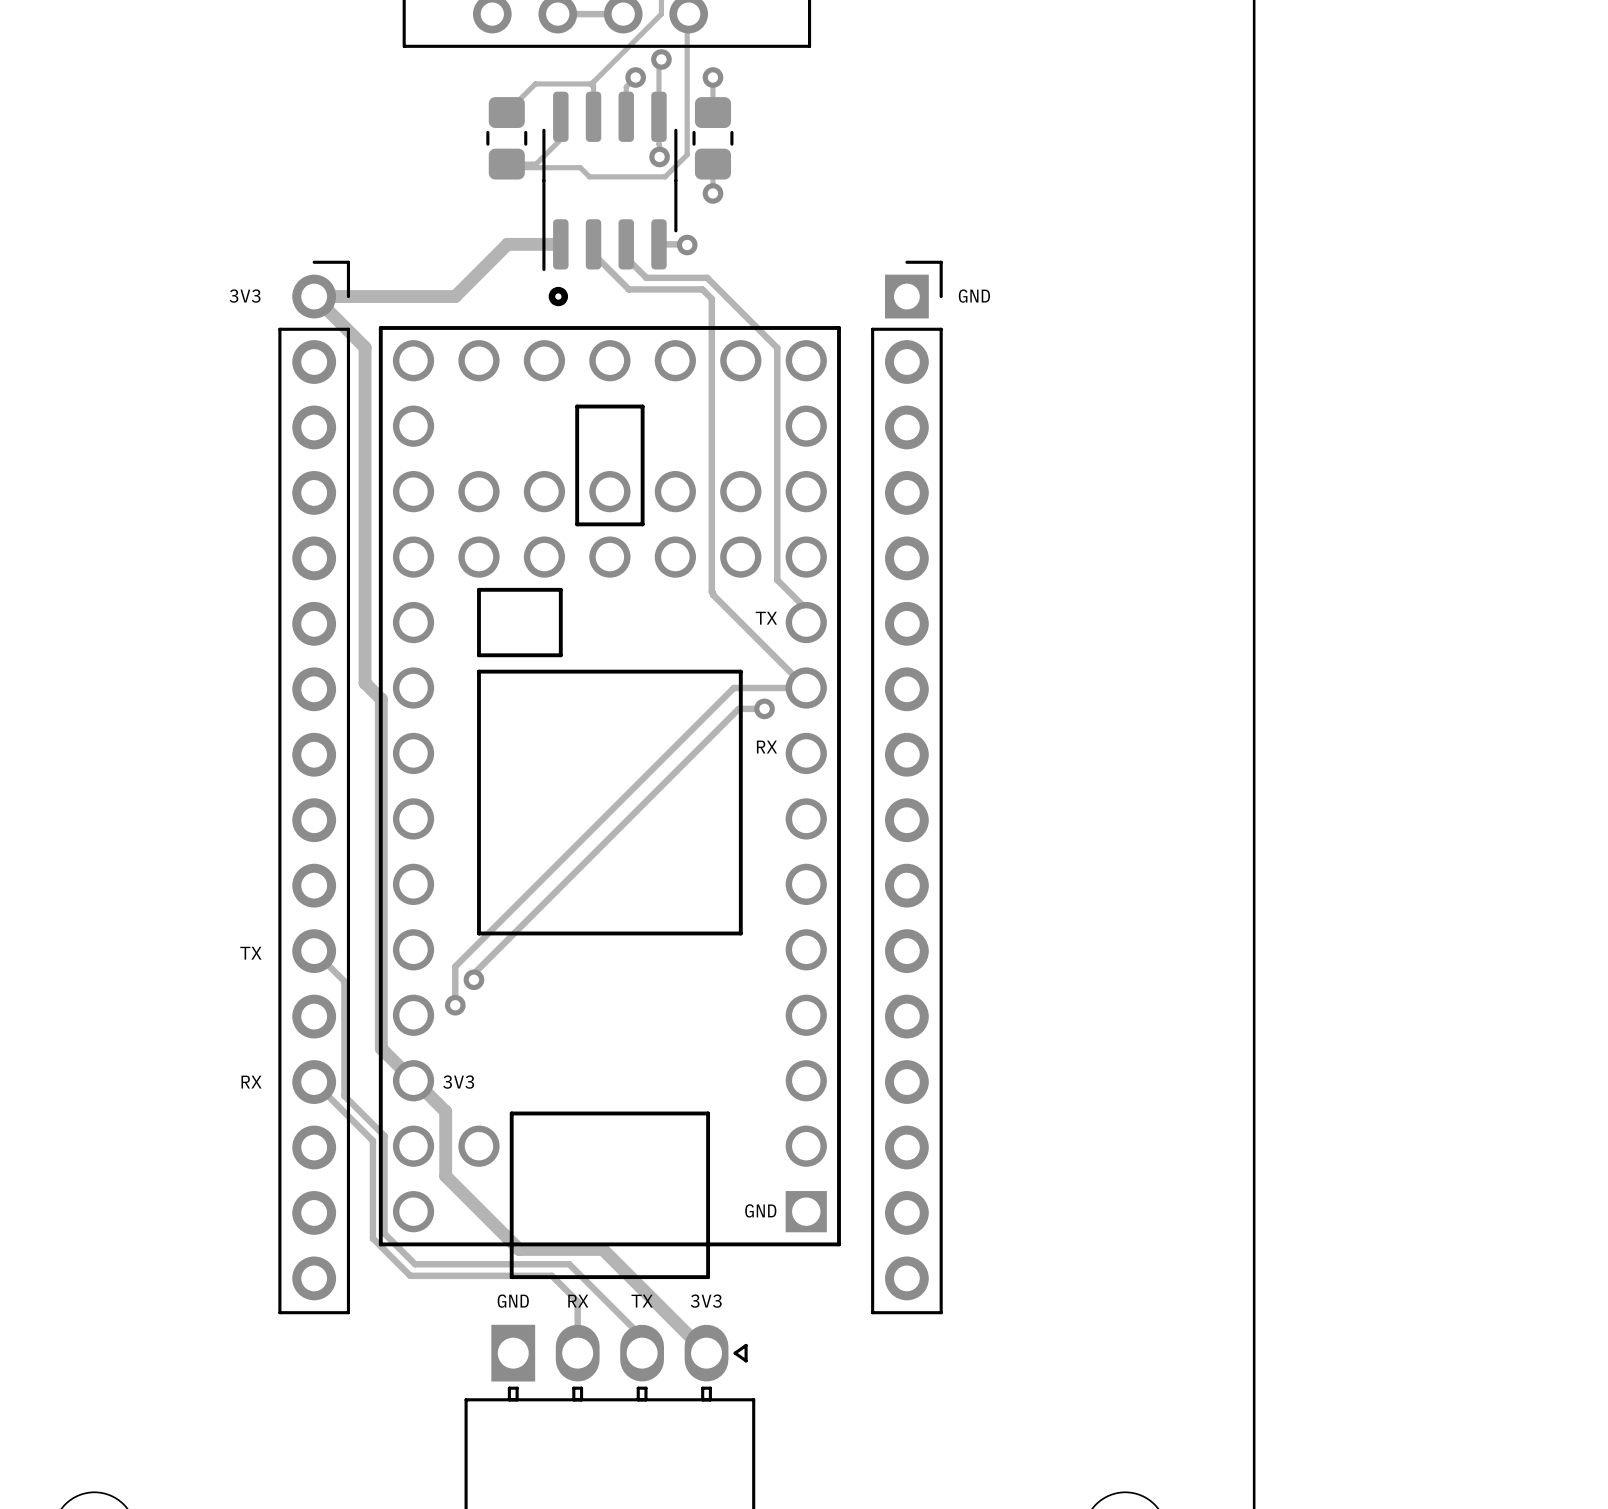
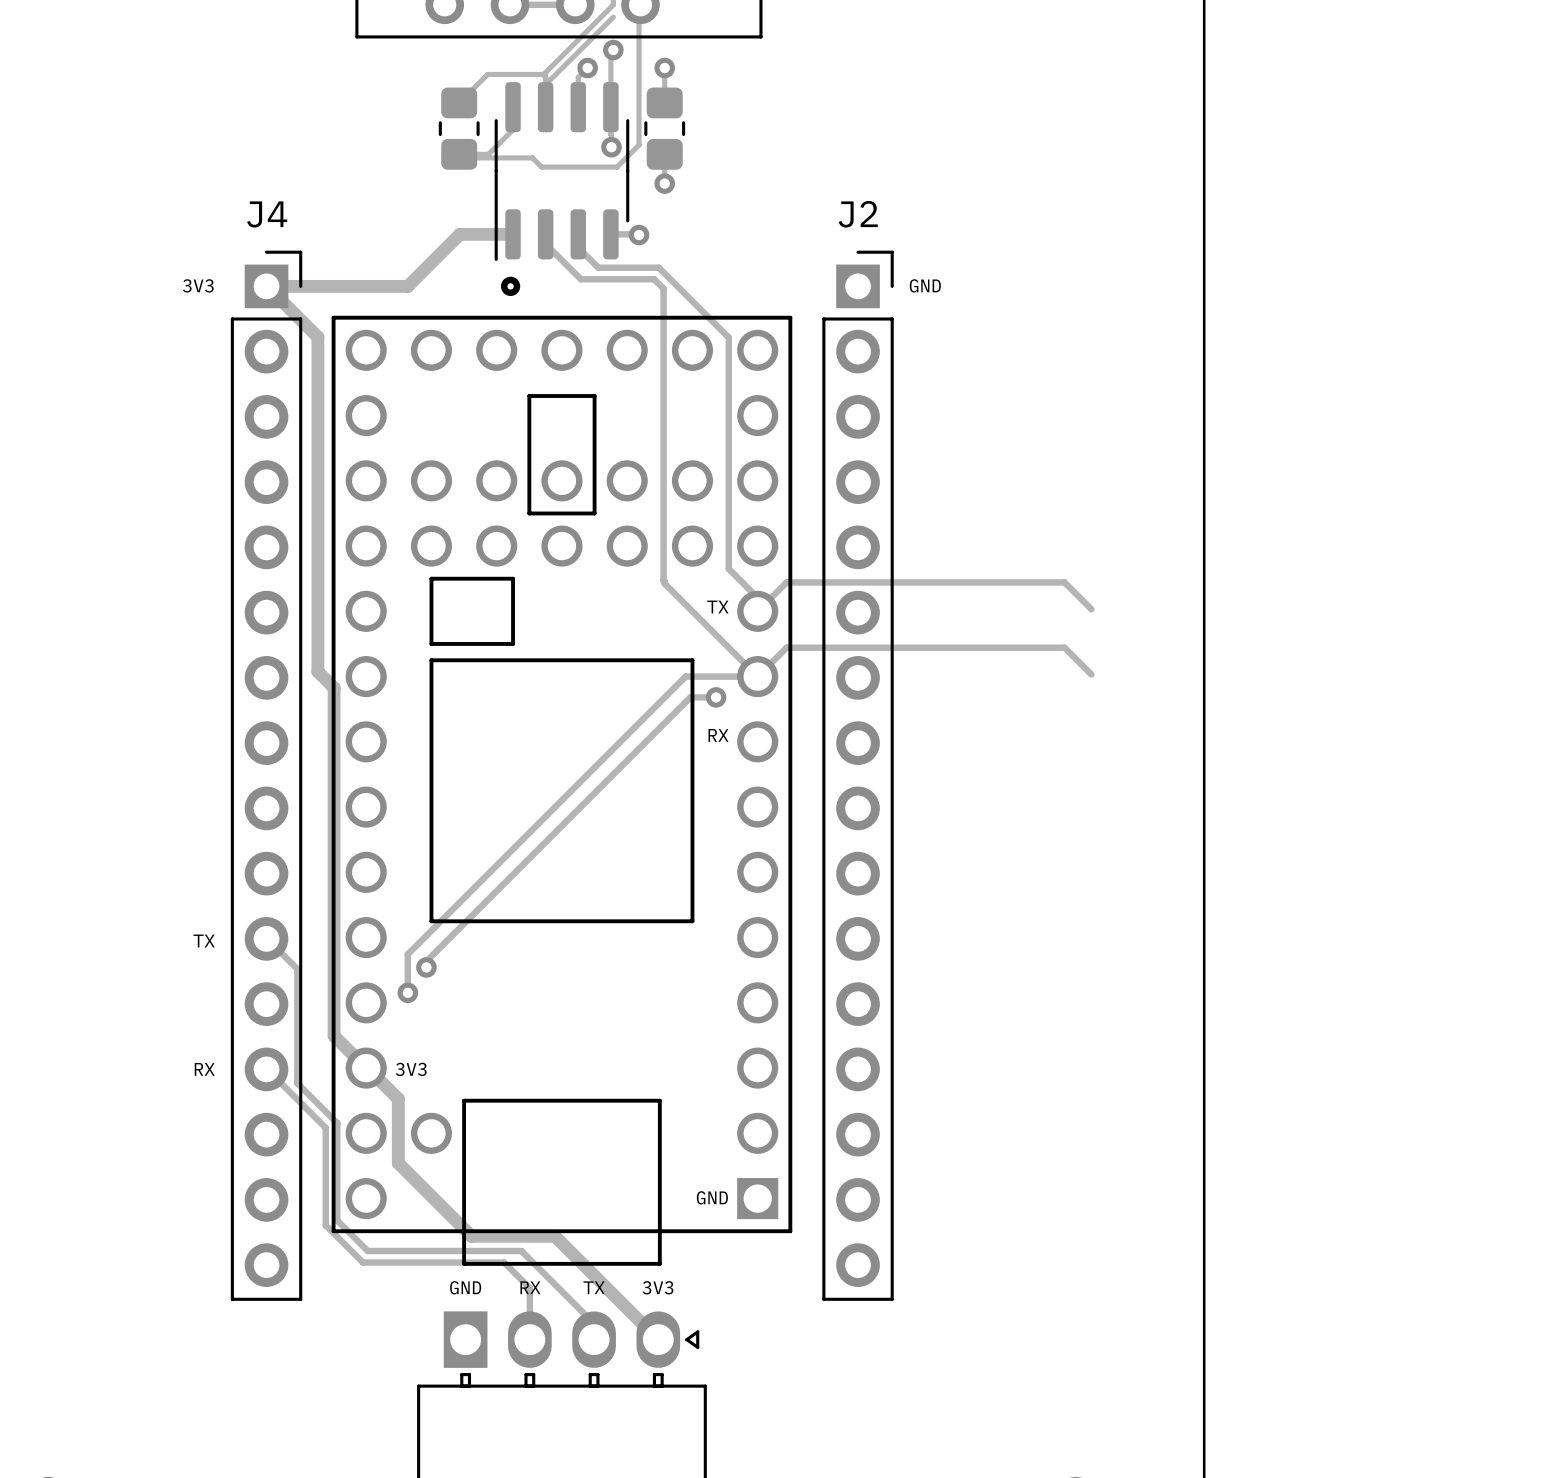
track: none -> (613, 17) (545, 84)
J2 name: none -> J2 (858, 214)
track: none -> (1091, 609) (1064, 582) (786, 582) (757, 611)
track: none -> (1091, 674) (1064, 647) (786, 647) (757, 676)
J4: none -> (266, 775)
part: (314, 787) -> none

